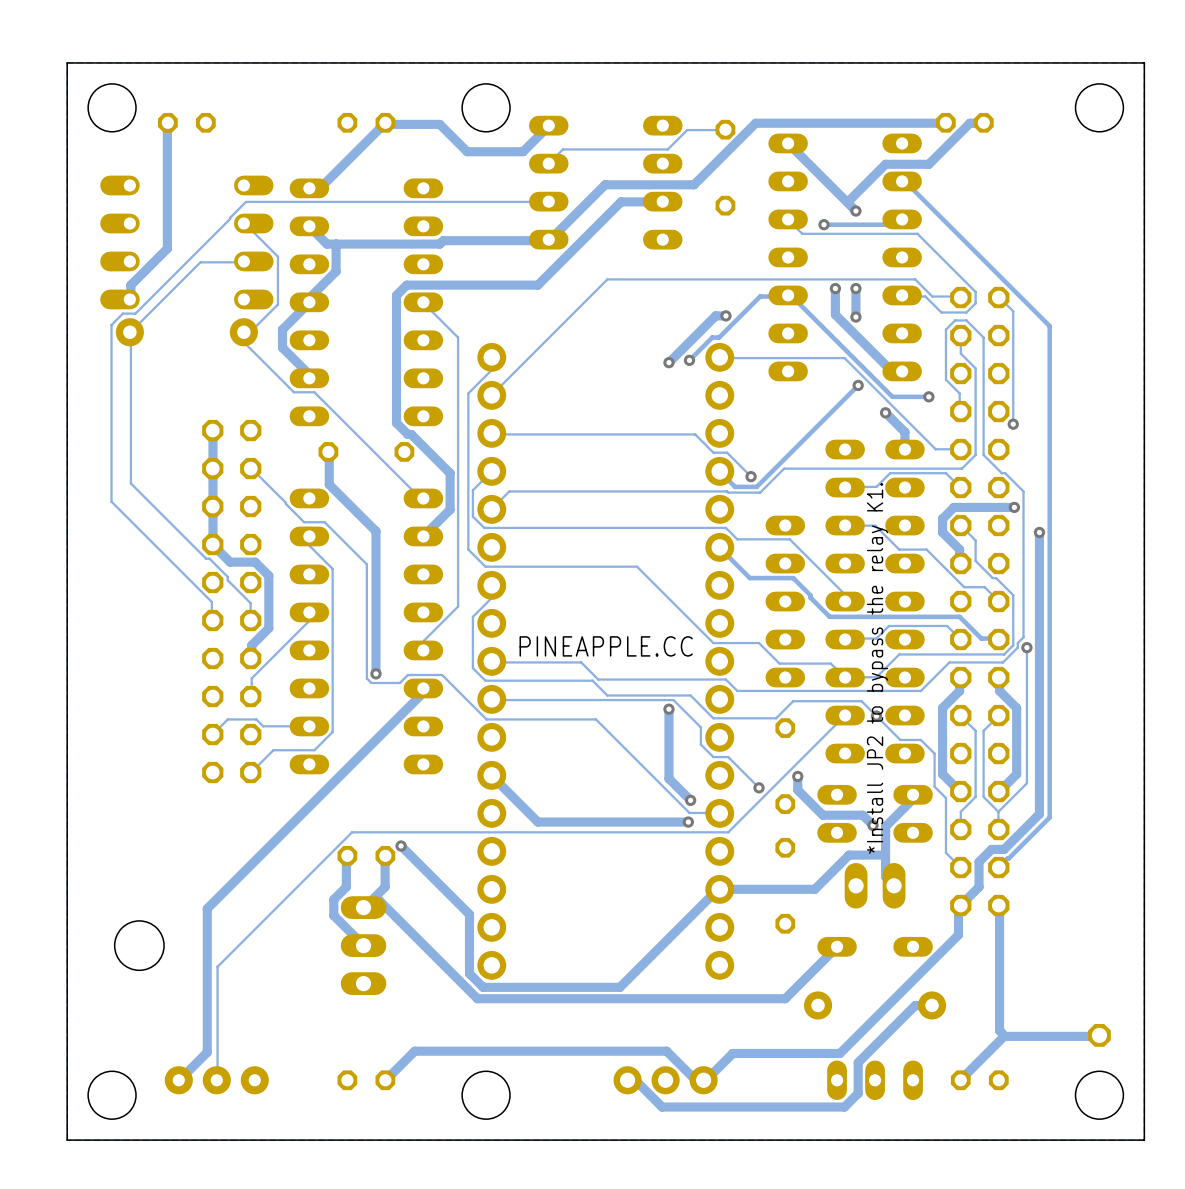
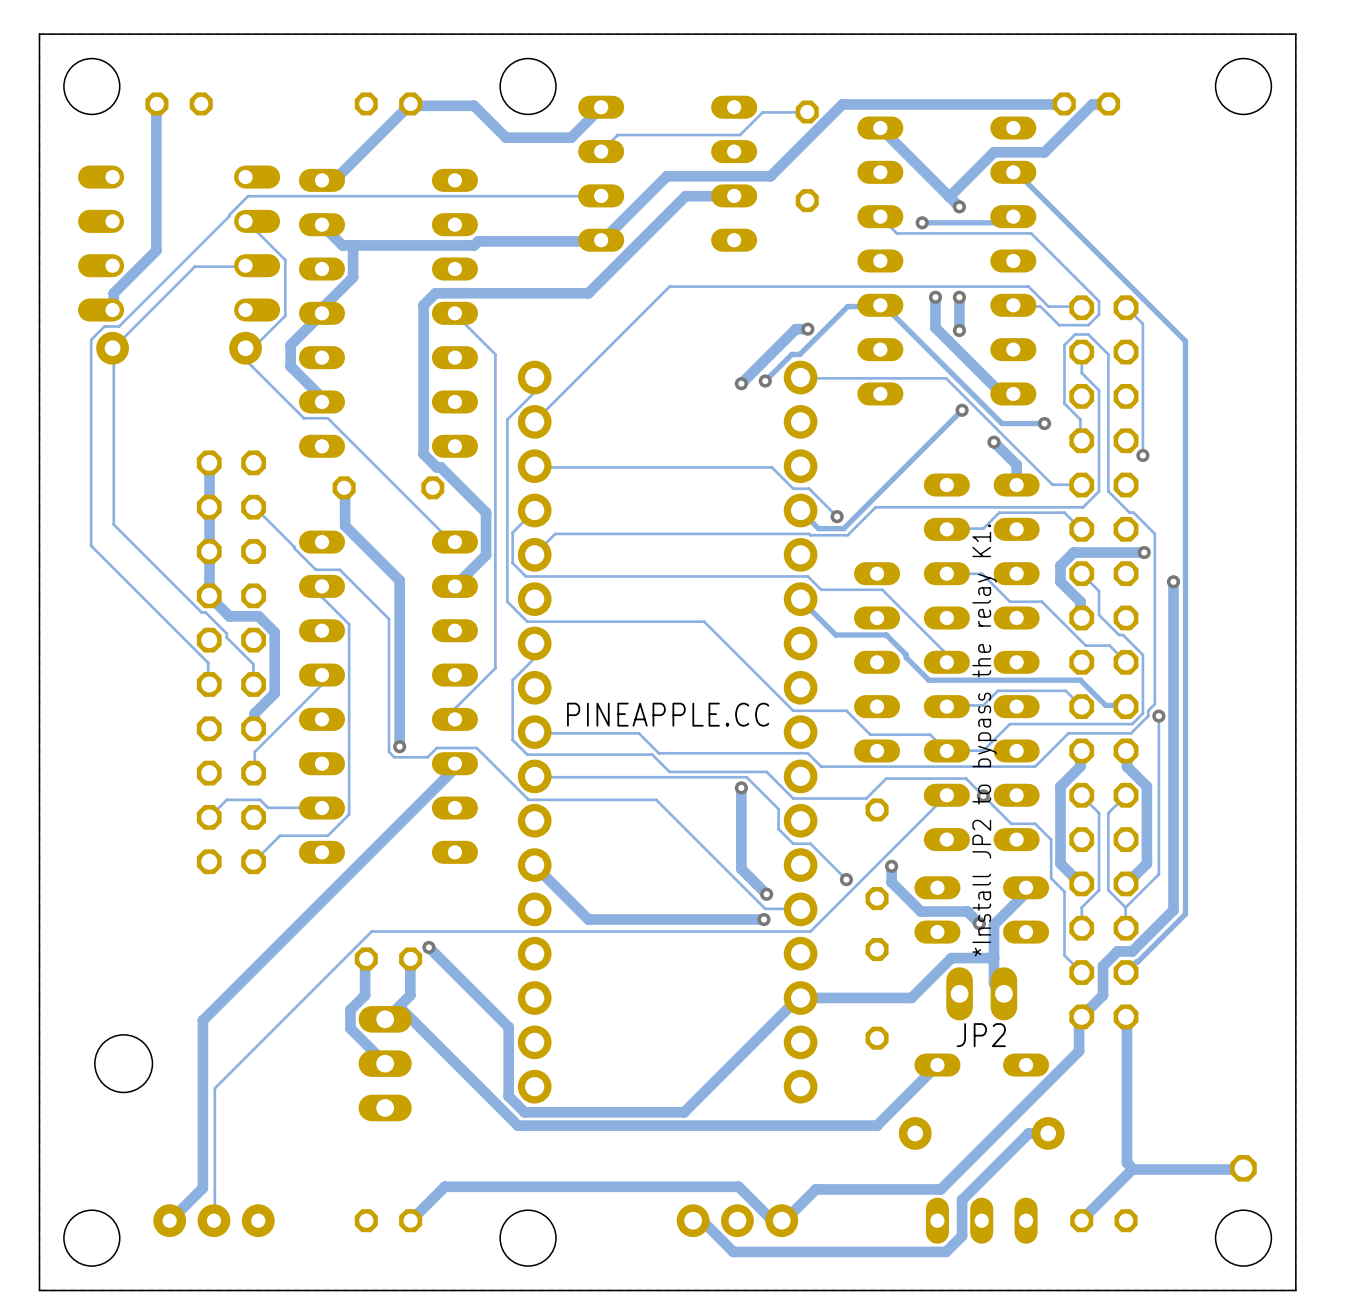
text: none -> JP2 (981, 1035)

